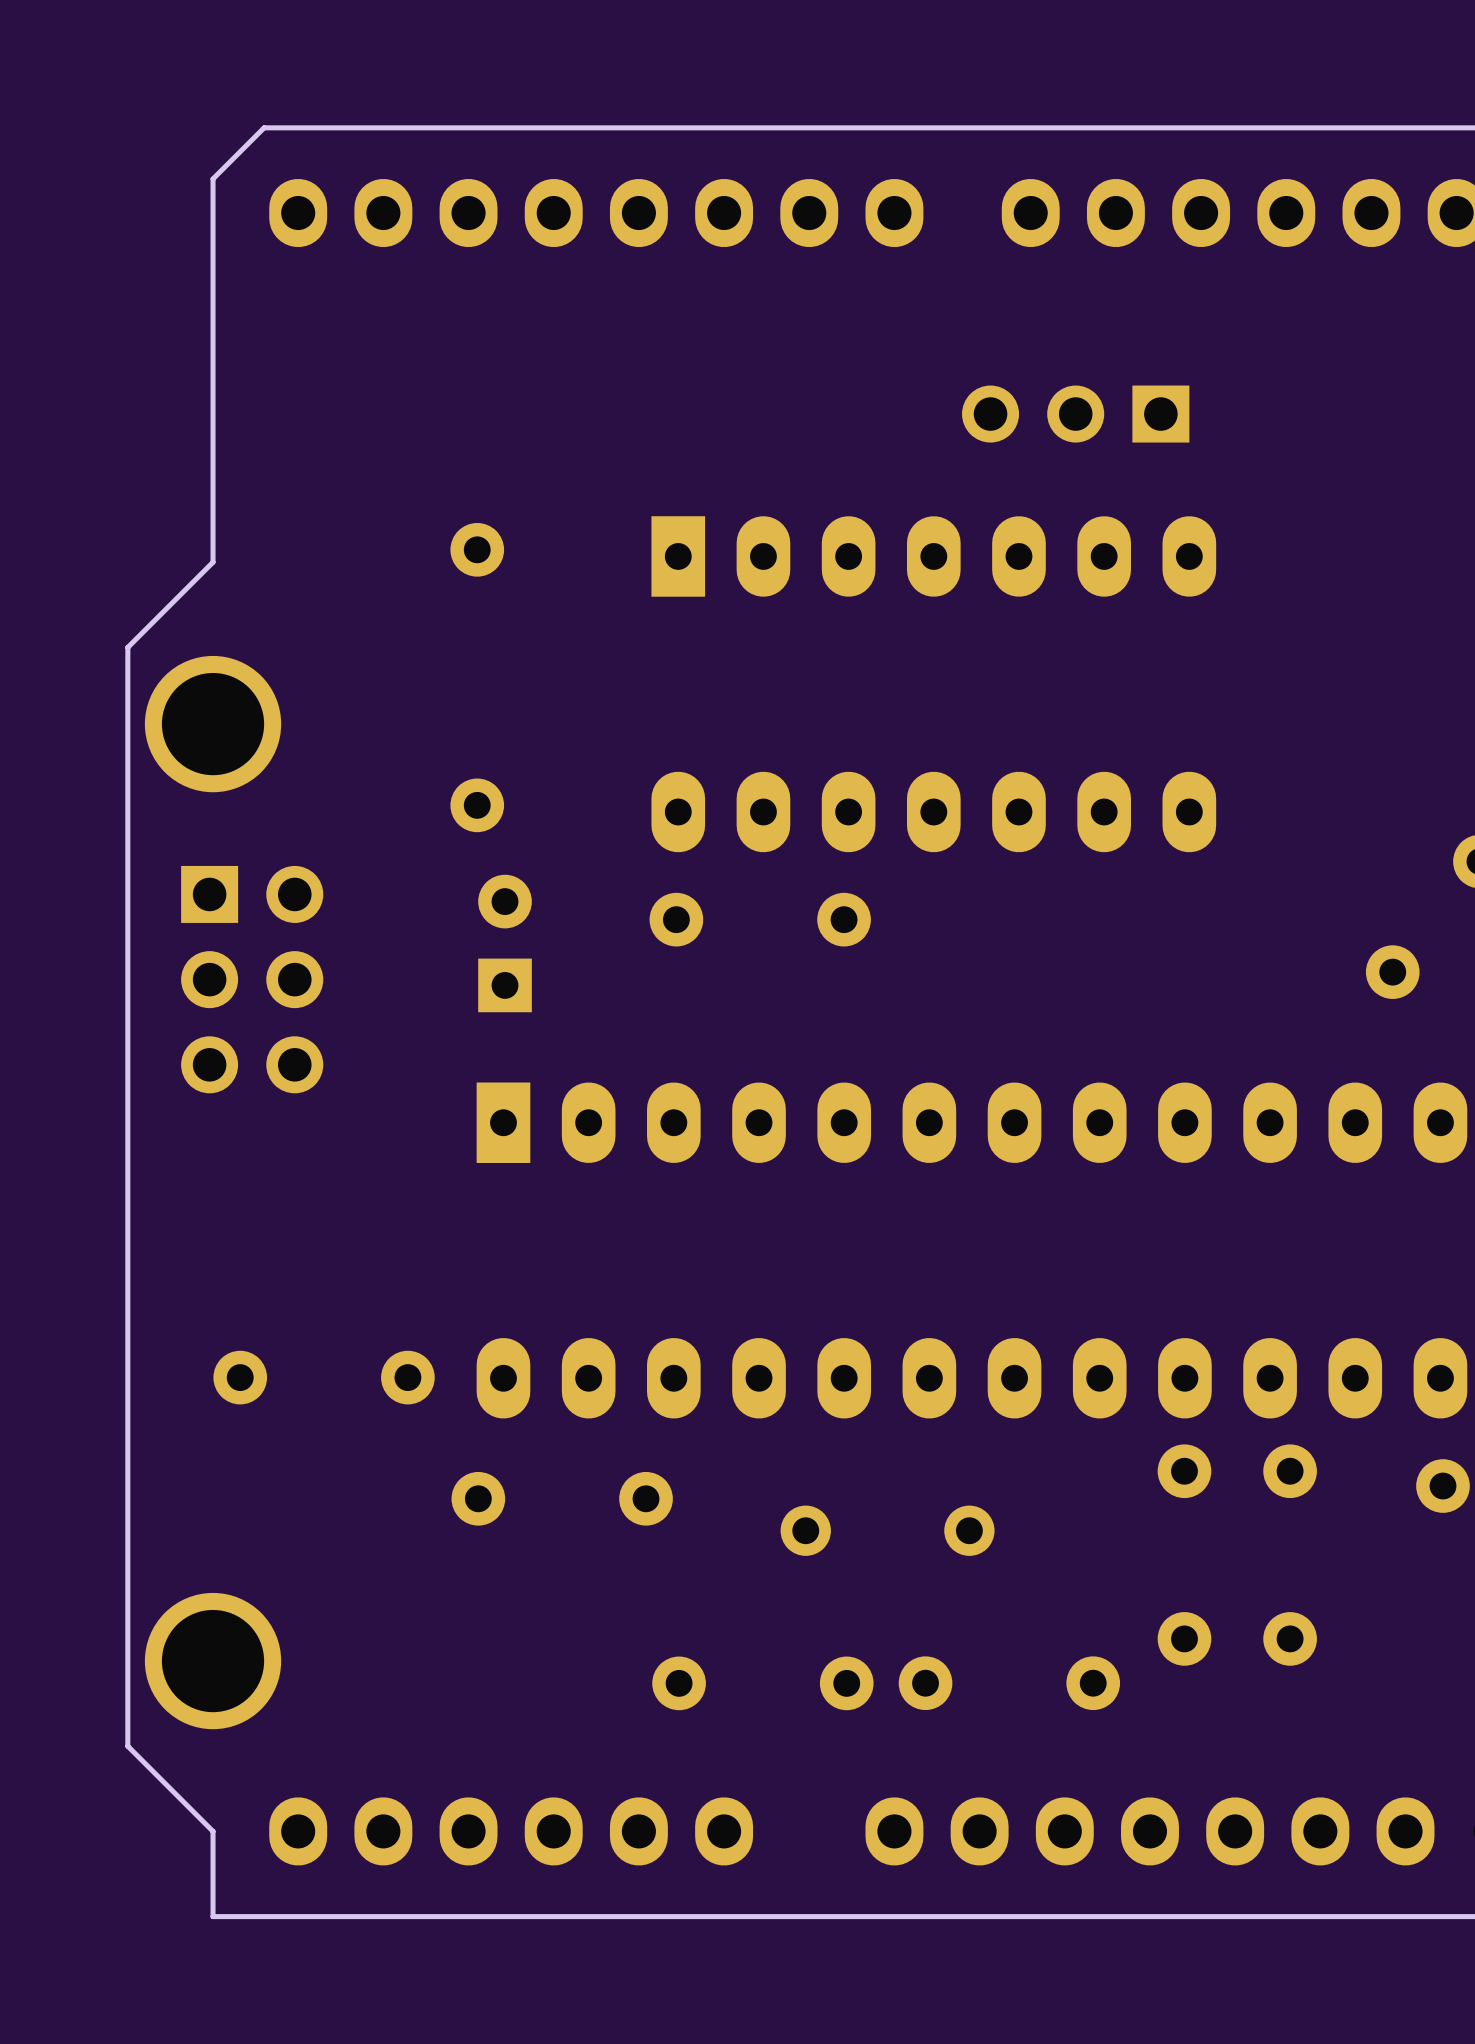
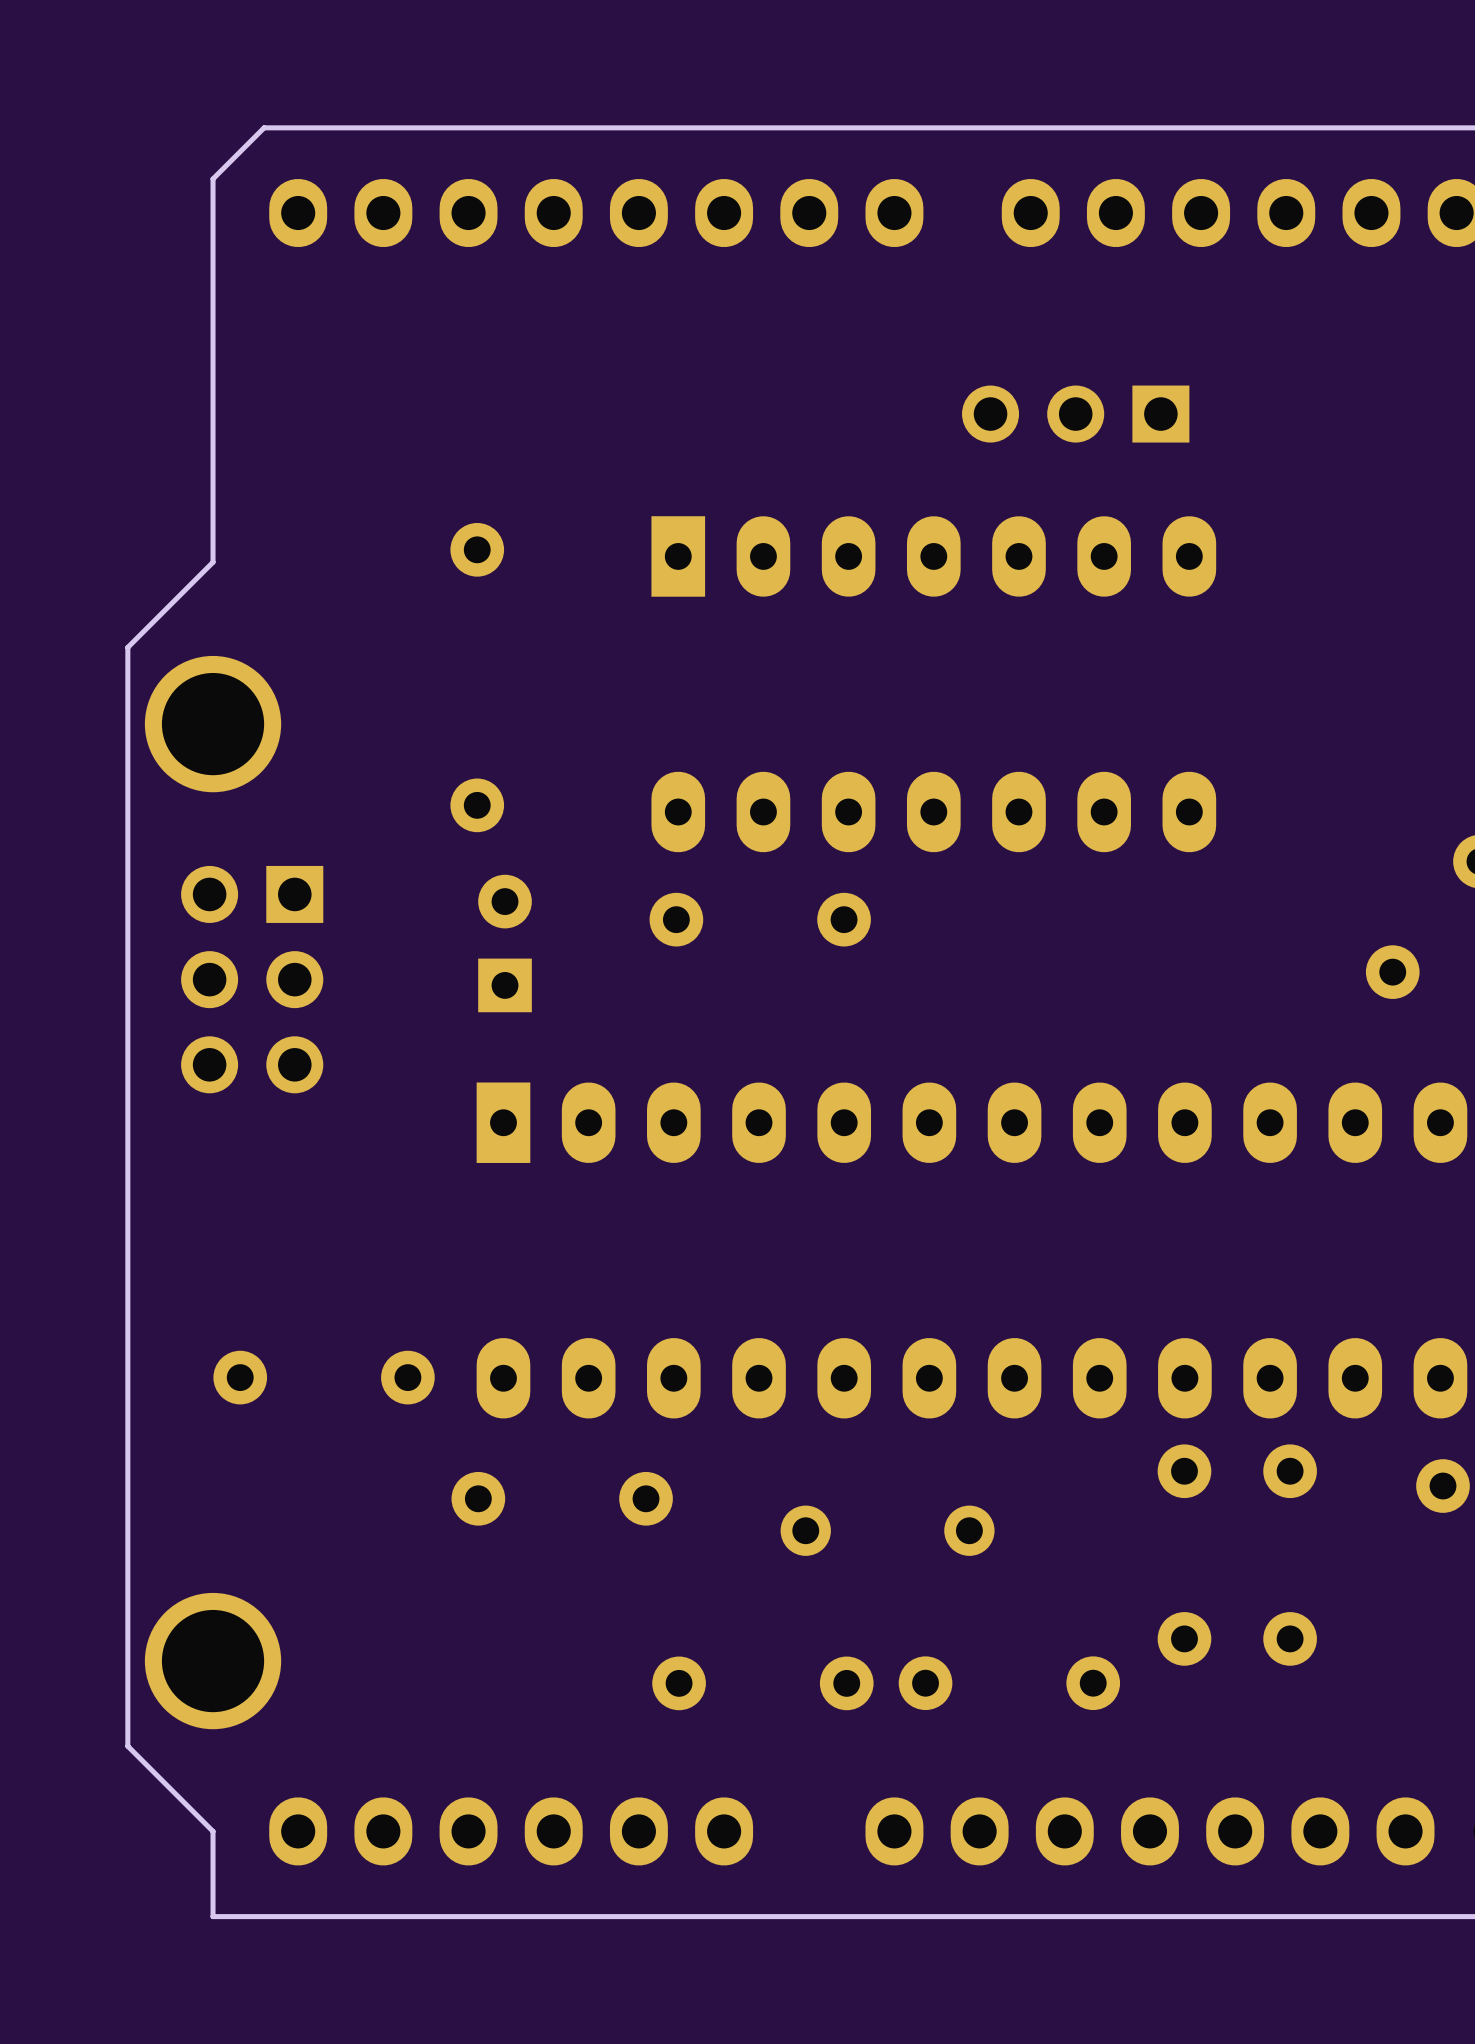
part footprint: [181, 865, 324, 1094] -> [181, 865, 324, 1094]

